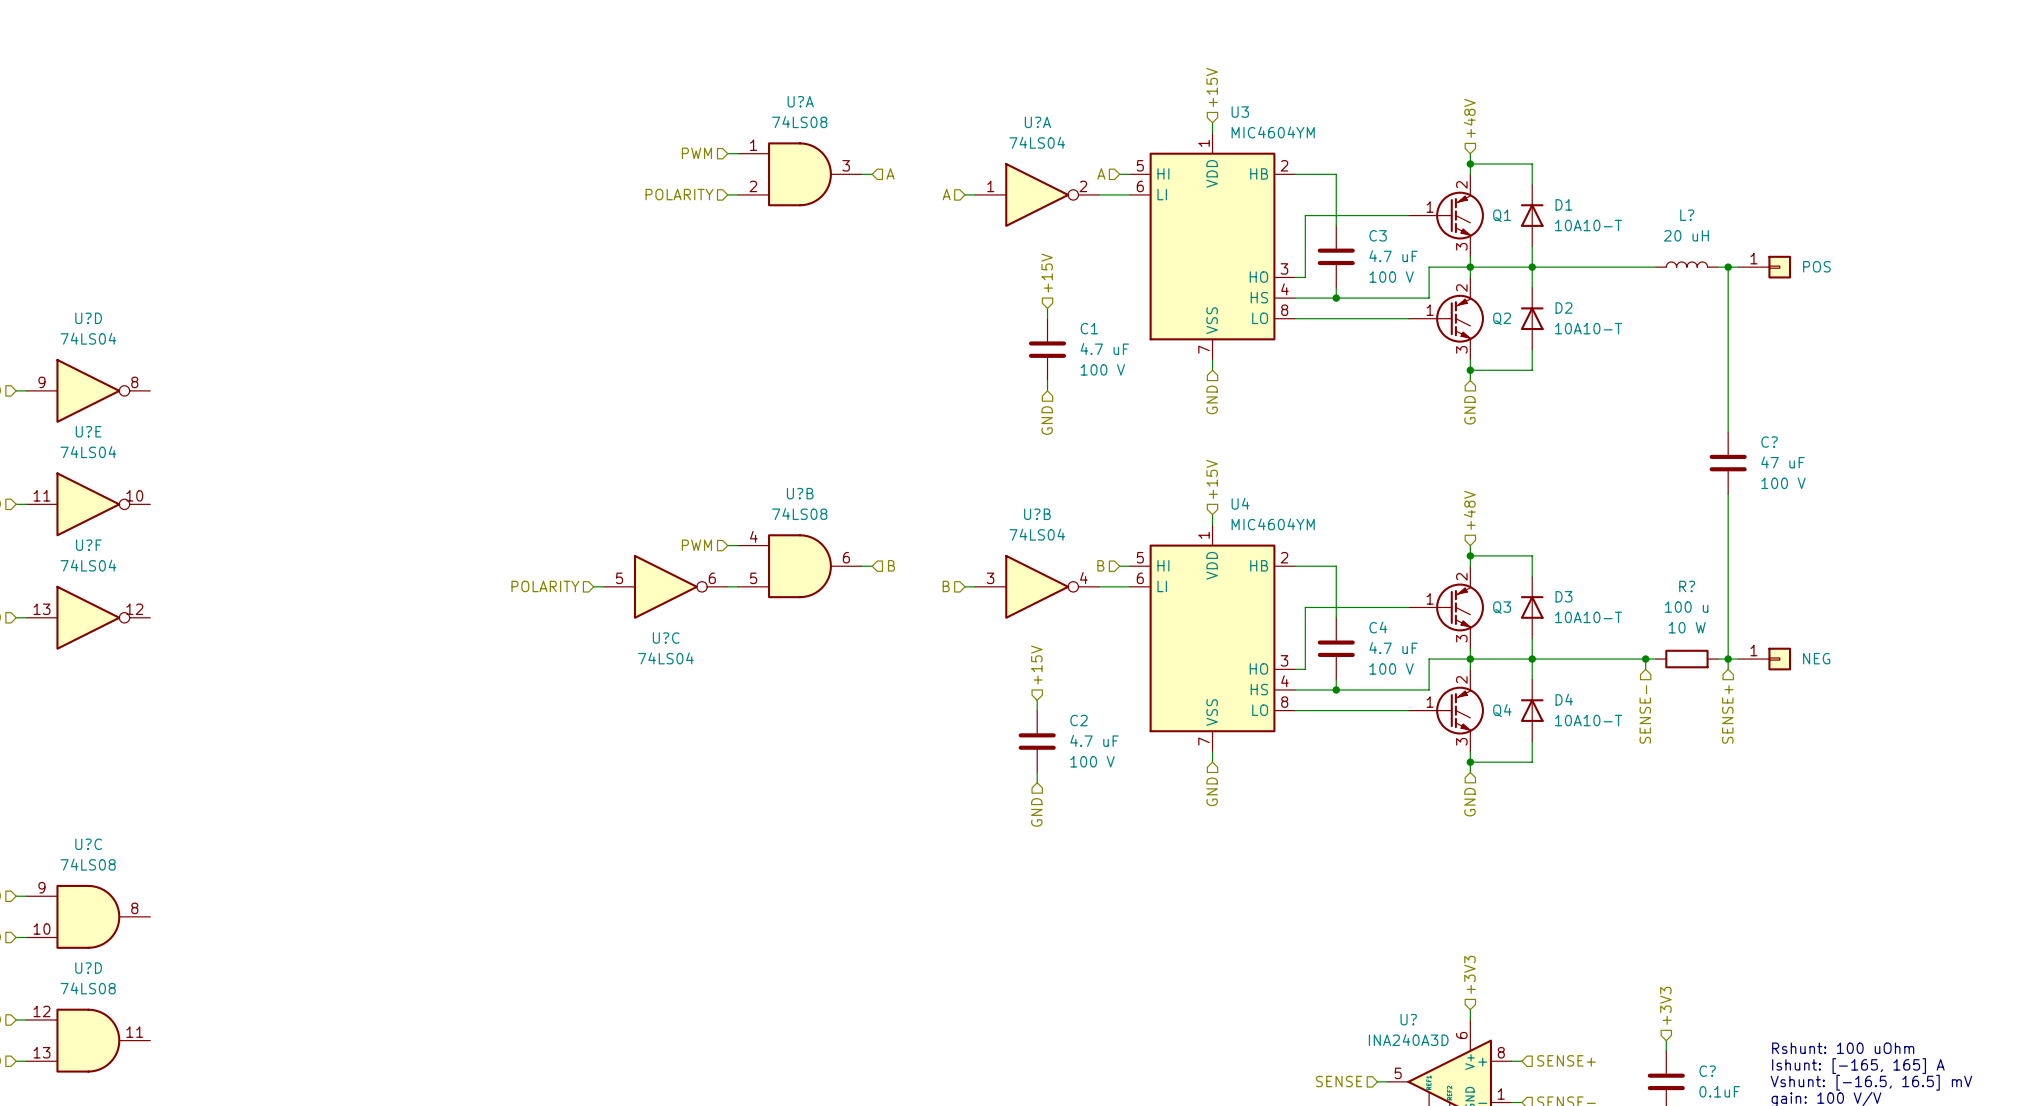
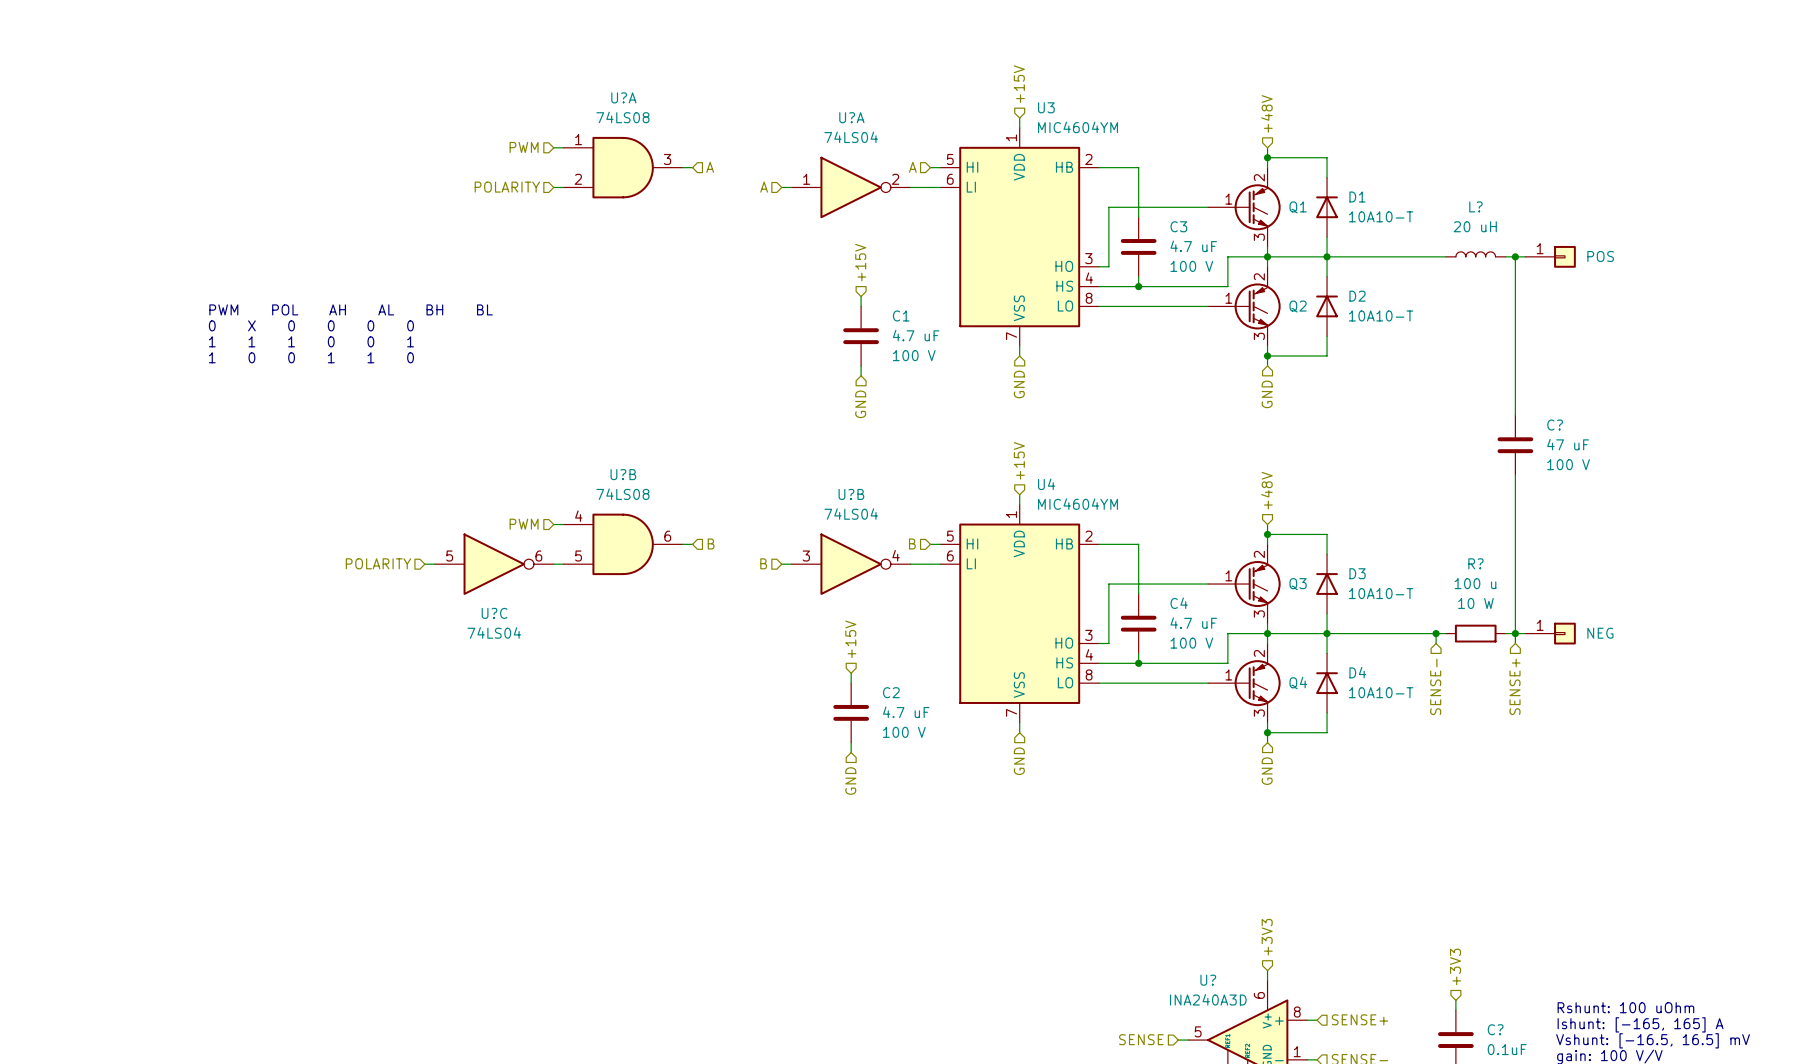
text: none -> PWM POL AH AL BH BL (351, 309)
text: none -> 0 X 0 0 0 0 (311, 325)
text: none -> 1 1 1 0 0 1 (311, 341)
text: none -> 1 0 0 1 1 0 (311, 357)

